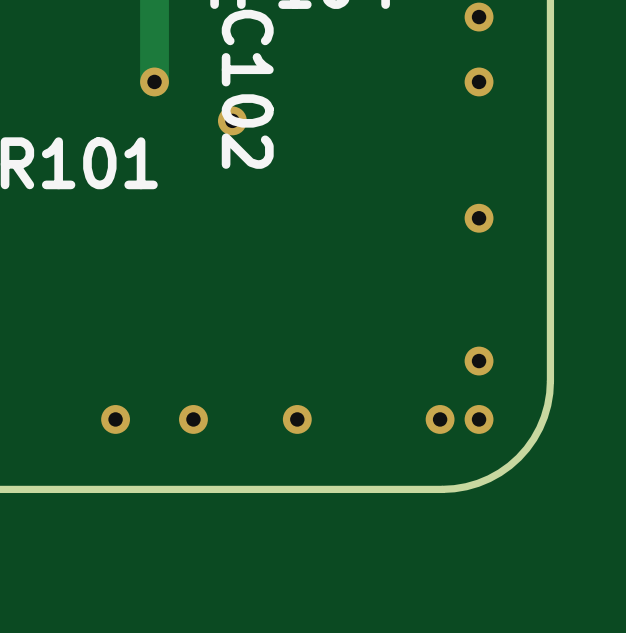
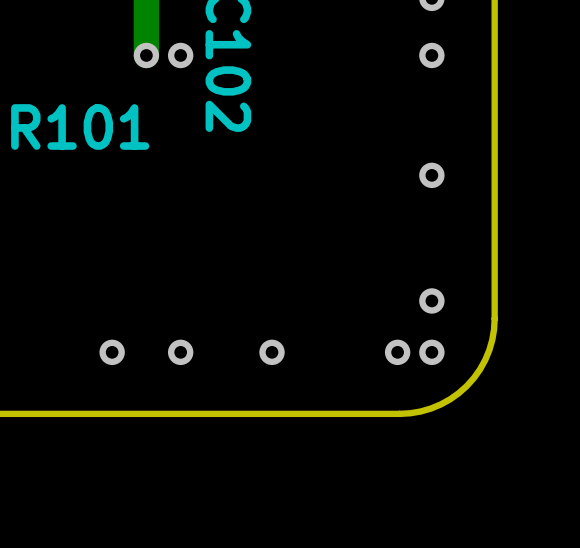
via position: (232, 120) -> (180, 55)

